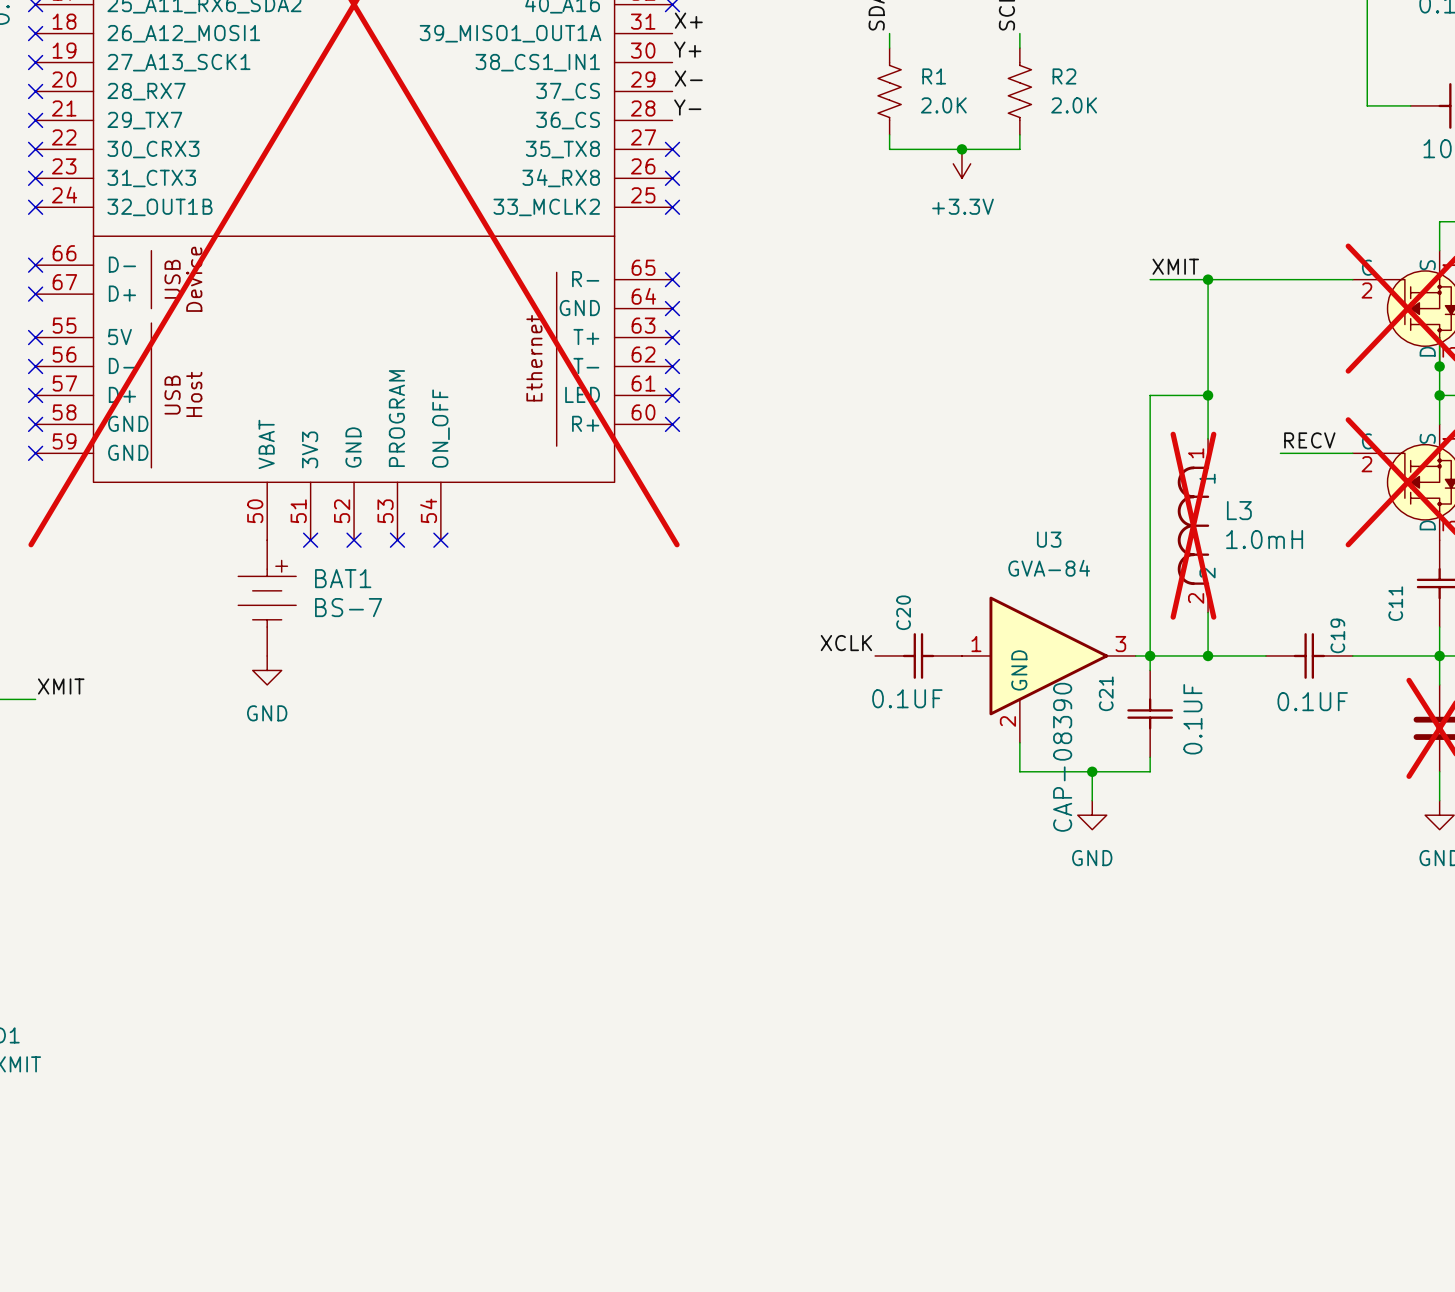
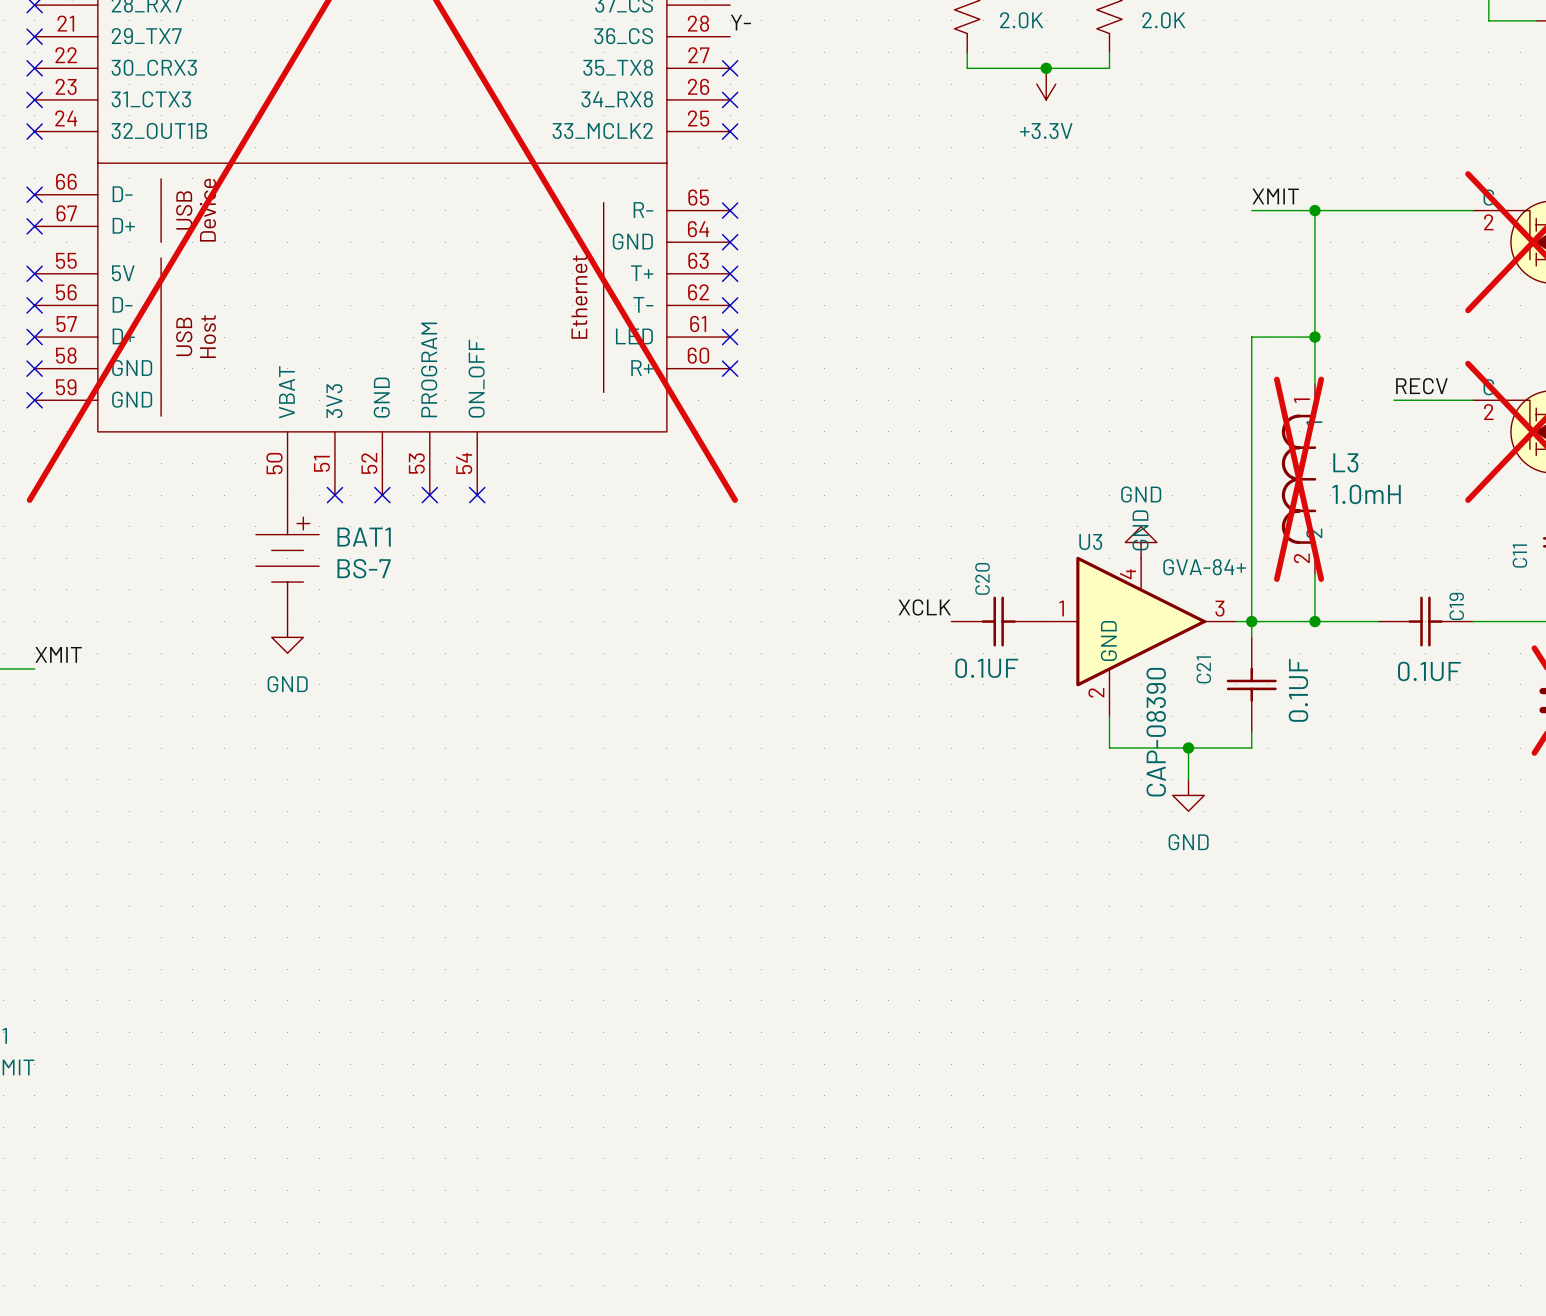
U3 name position: U3 (1049, 539) -> U3 (1090, 542)
U3 value: GVA-84 (1049, 568) -> GVA-84+ (1204, 567)
power symbol: none -> GND (1141, 542)
U3 symbol: [961, 596, 1136, 743] -> [1046, 556, 1236, 717]

